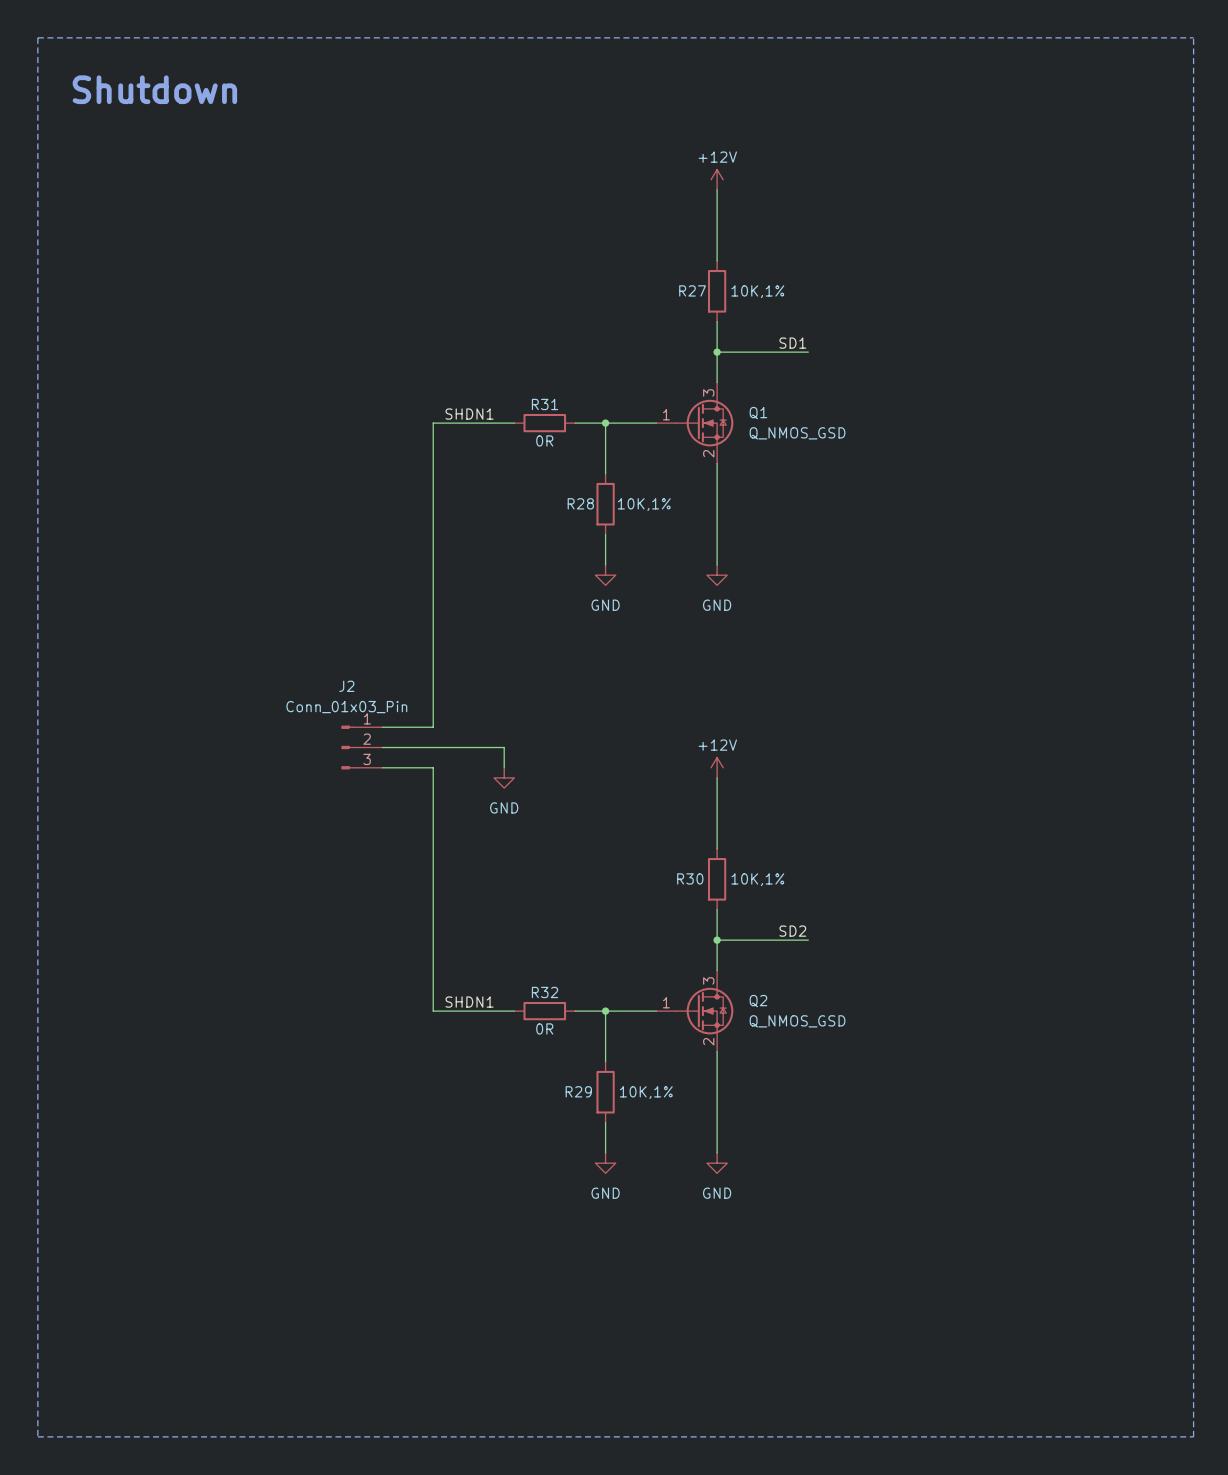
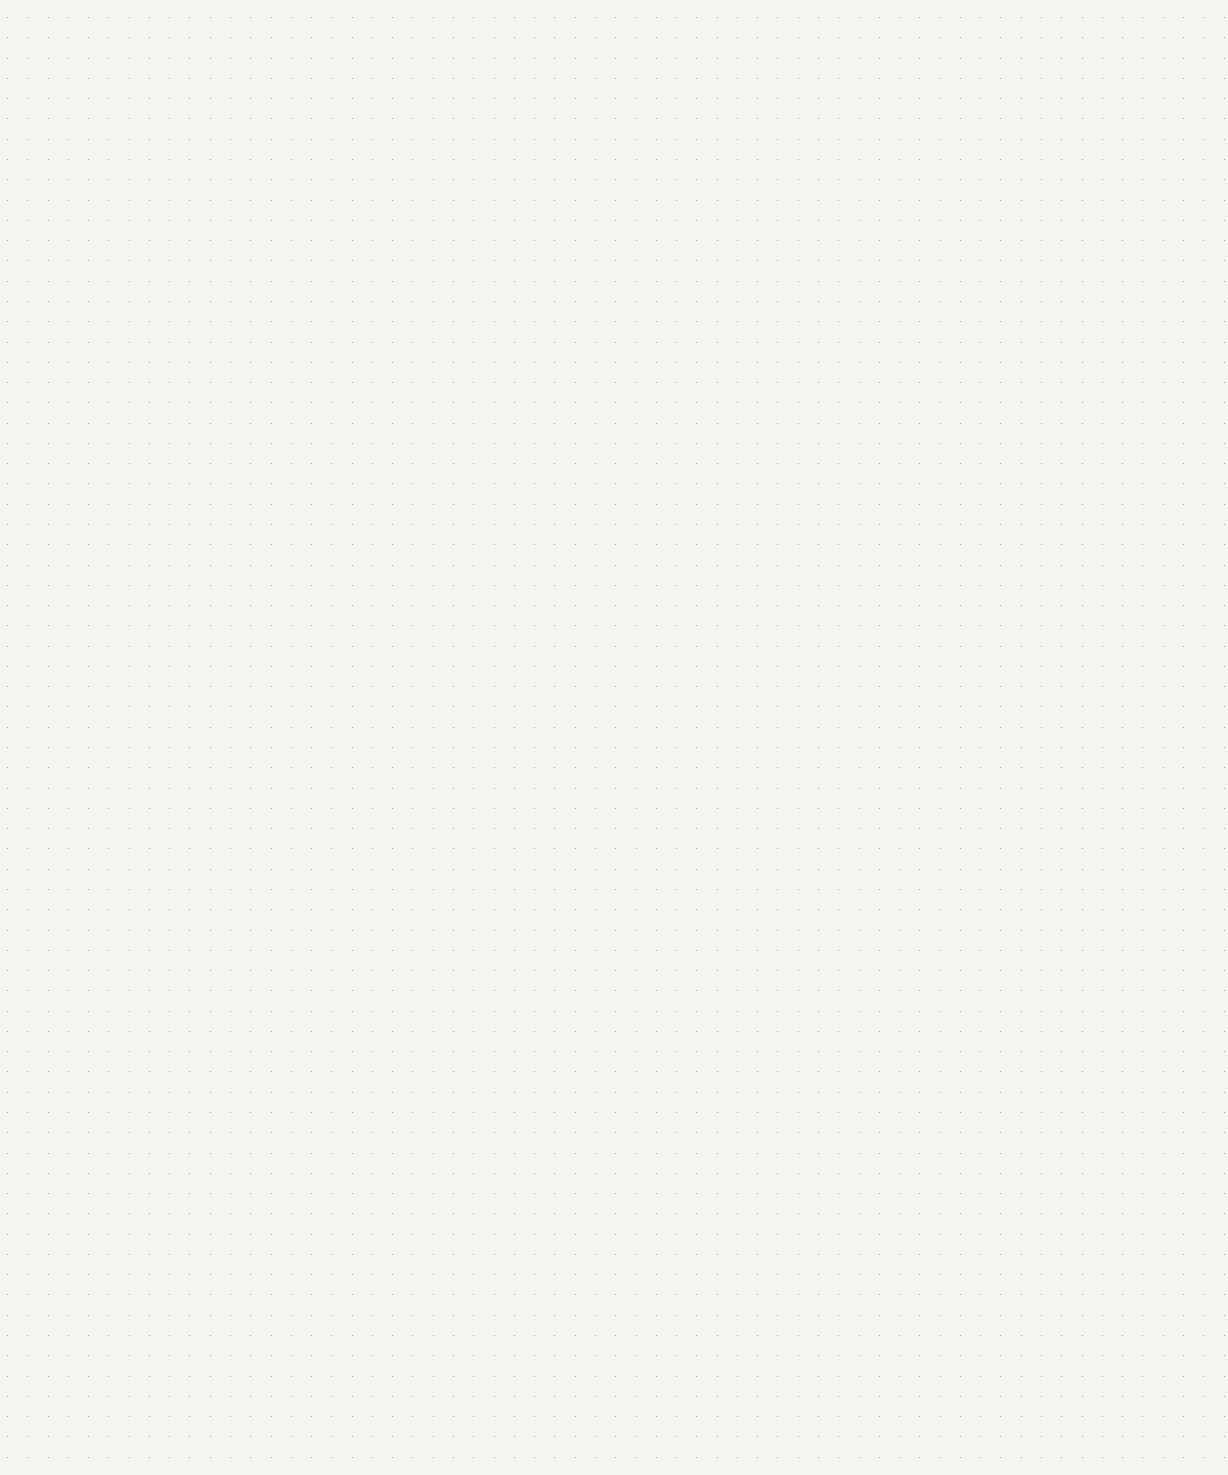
line: (37, 37) (1193, 37) (1193, 1436) (37, 1436) (37, 37) -> none
text: Shutdown (154, 89) -> none
power symbol: +12V (717, 179) -> none
wire: (717, 189) (717, 260) -> none
R27: 10K,1% (717, 291) -> none
wire: (717, 321) (717, 382) -> none
label: SD1 (792, 343) -> none
wire: (717, 352) (808, 352) -> none
junction: (717, 352) -> none
label: SHDN1 (469, 414) -> none
wire: (514, 423) (433, 423) (433, 727) (382, 727) -> none
R31: 0R (544, 423) -> none
wire: (575, 423) (656, 423) -> none
wire: (605, 423) (605, 473) -> none
junction: (605, 423) -> none
Q1: Q_NMOS_GSD (694, 423) -> none
wire: (717, 463) (717, 565) -> none
R28: 10K,1% (605, 504) -> none
wire: (605, 534) (605, 565) -> none
power symbol: GND (605, 575) -> none
power symbol: GND (717, 575) -> none
J2: Conn_01x03_Pin (361, 747) -> none
wire: (382, 747) (504, 747) (504, 767) -> none
wire: (382, 767) (433, 767) (433, 1011) (514, 1011) -> none
power symbol: +12V (717, 767) -> none
power symbol: GND (504, 777) -> none
wire: (717, 777) (717, 848) -> none
R30: 10K,1% (717, 879) -> none
wire: (717, 909) (717, 970) -> none
label: SD2 (792, 931) -> none
wire: (717, 940) (808, 940) -> none
junction: (717, 940) -> none
label: SHDN1 (469, 1002) -> none
R32: 0R (544, 1011) -> none
wire: (575, 1011) (656, 1011) -> none
wire: (605, 1011) (605, 1061) -> none
junction: (605, 1011) -> none
Q2: Q_NMOS_GSD (694, 1011) -> none
wire: (717, 1051) (717, 1153) -> none
R29: 10K,1% (605, 1092) -> none
wire: (605, 1122) (605, 1153) -> none
power symbol: GND (605, 1163) -> none
power symbol: GND (717, 1163) -> none

